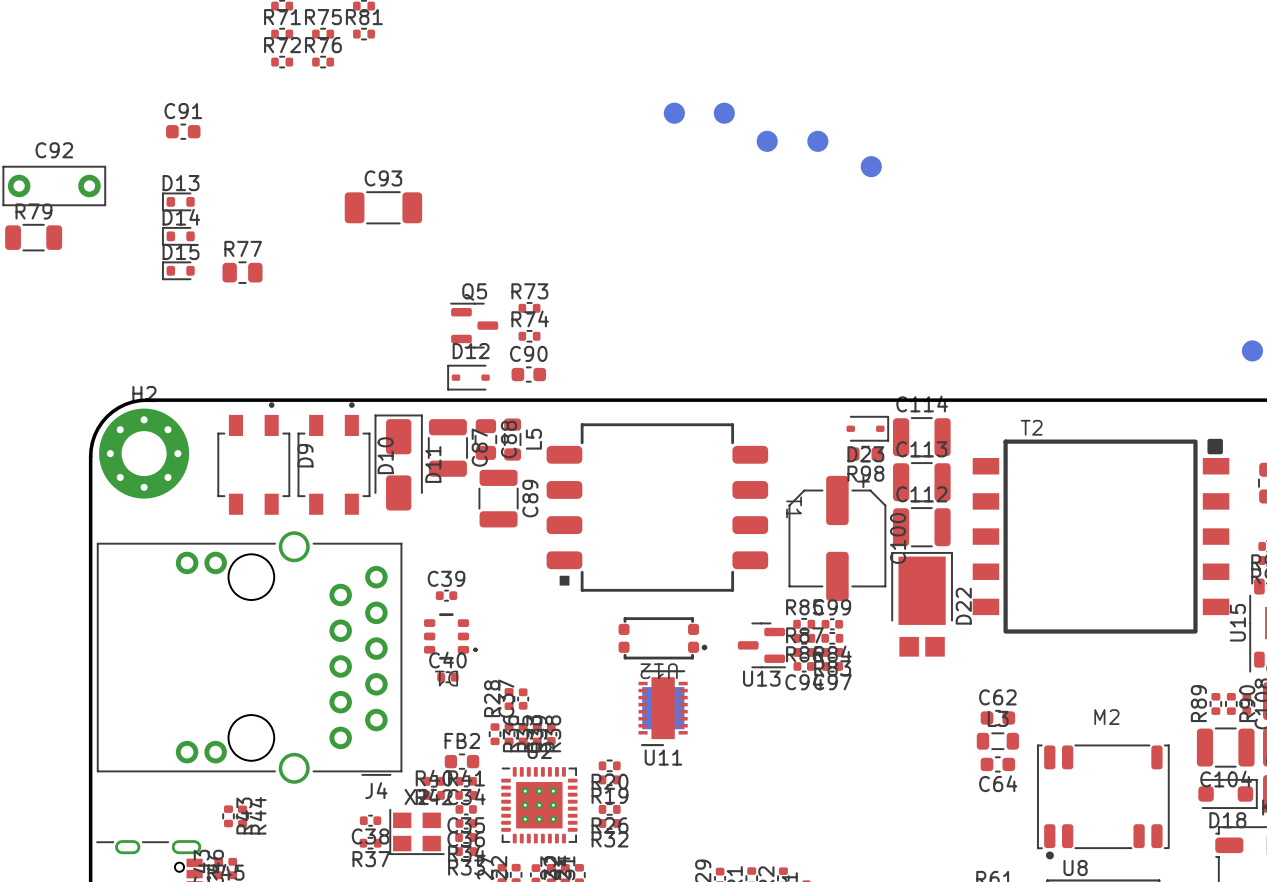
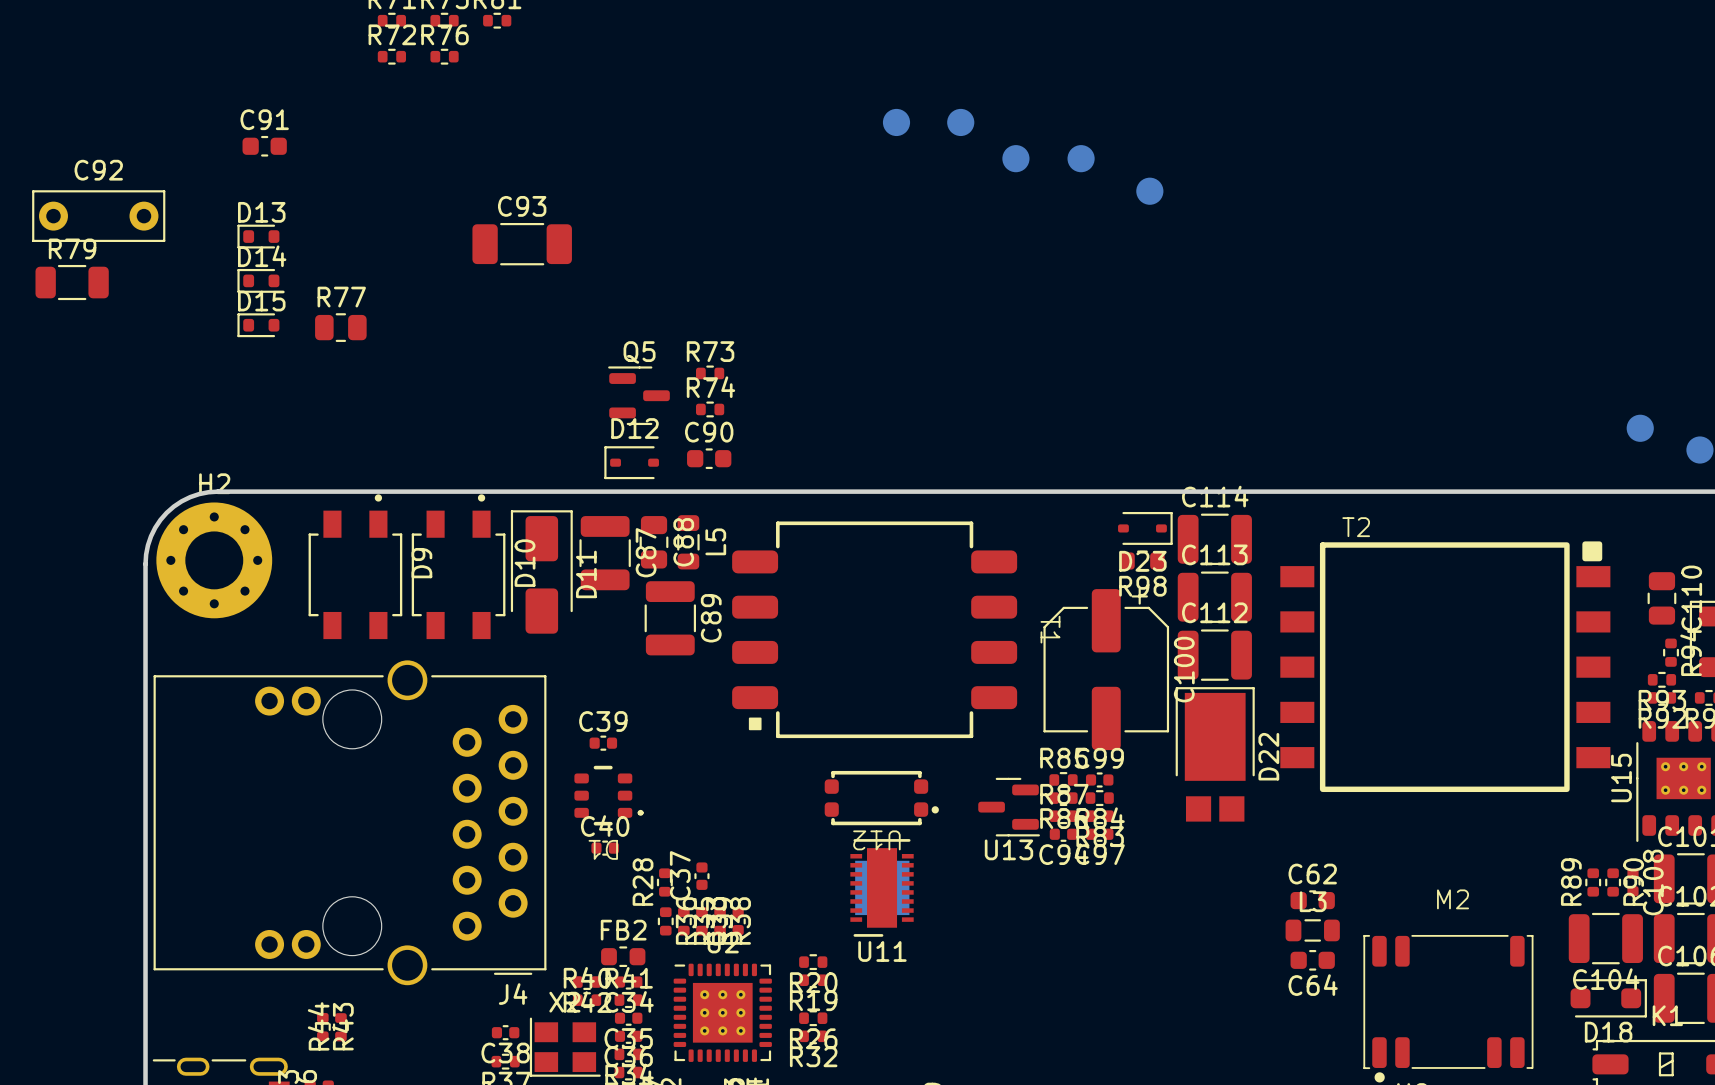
R28 position: (509, 699) -> (664, 882)
R44 name position: R44 (258, 815) -> R44 (318, 1026)

